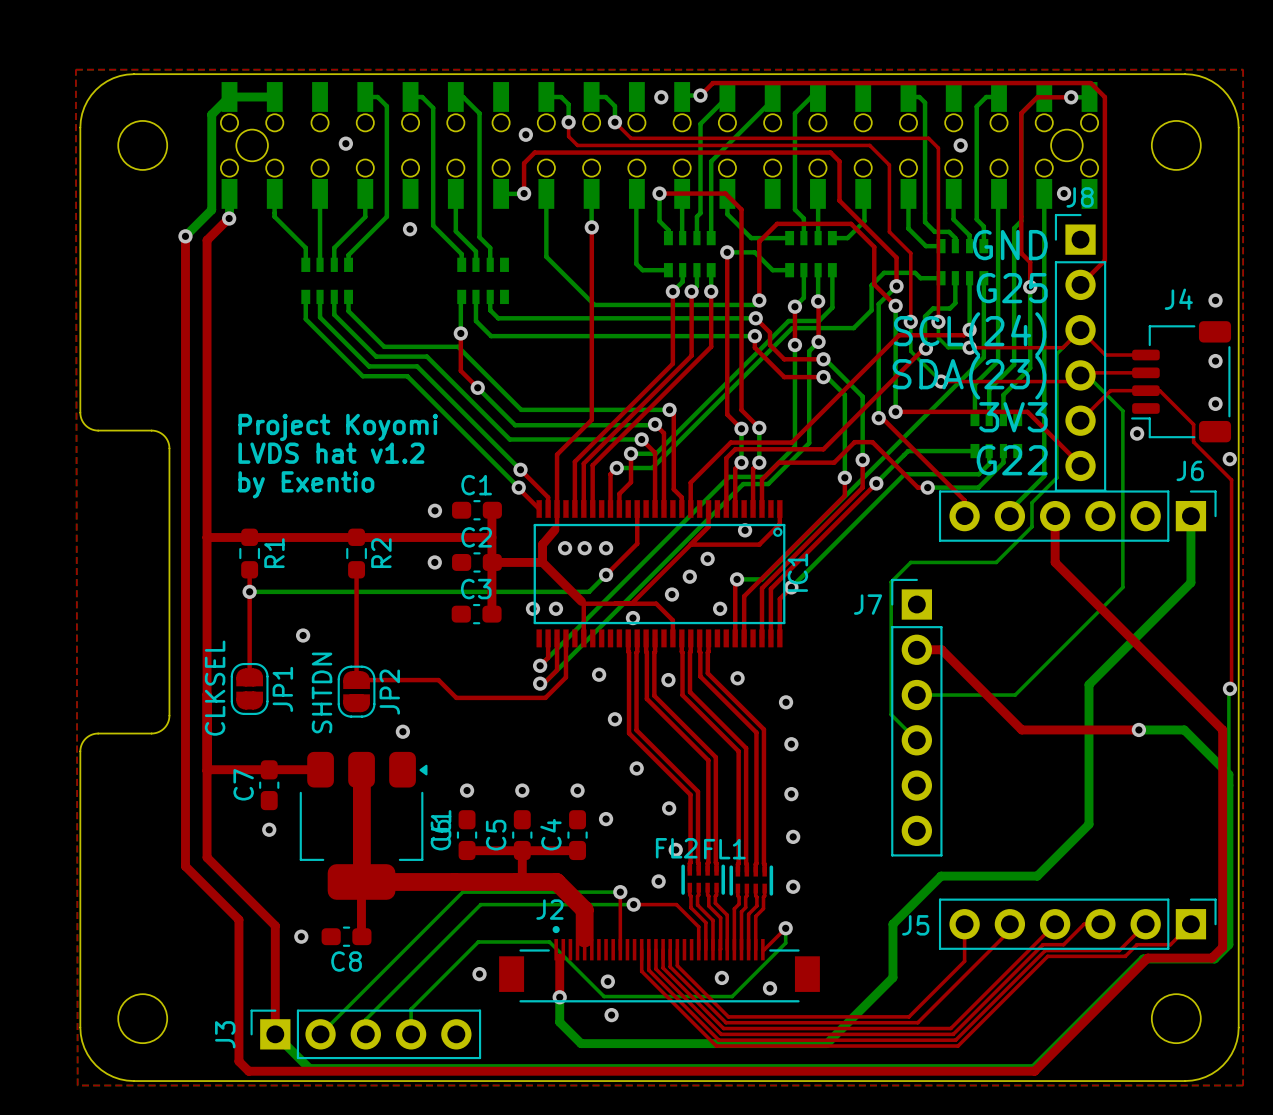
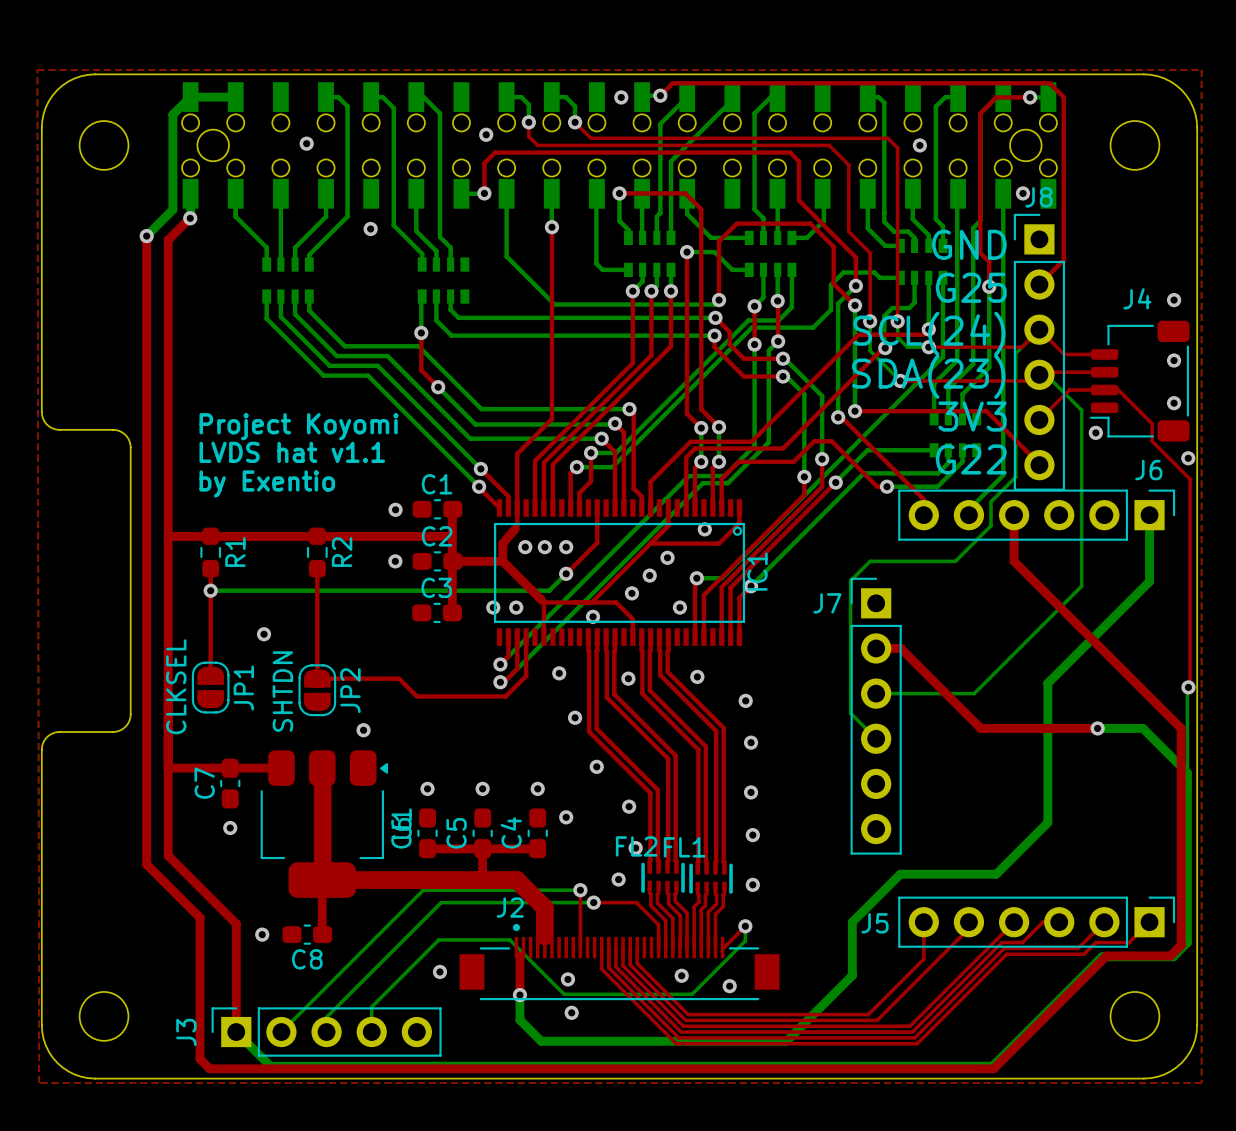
text: LVDS hat v1.2 (331, 453) -> LVDS hat v1.1 (292, 452)

